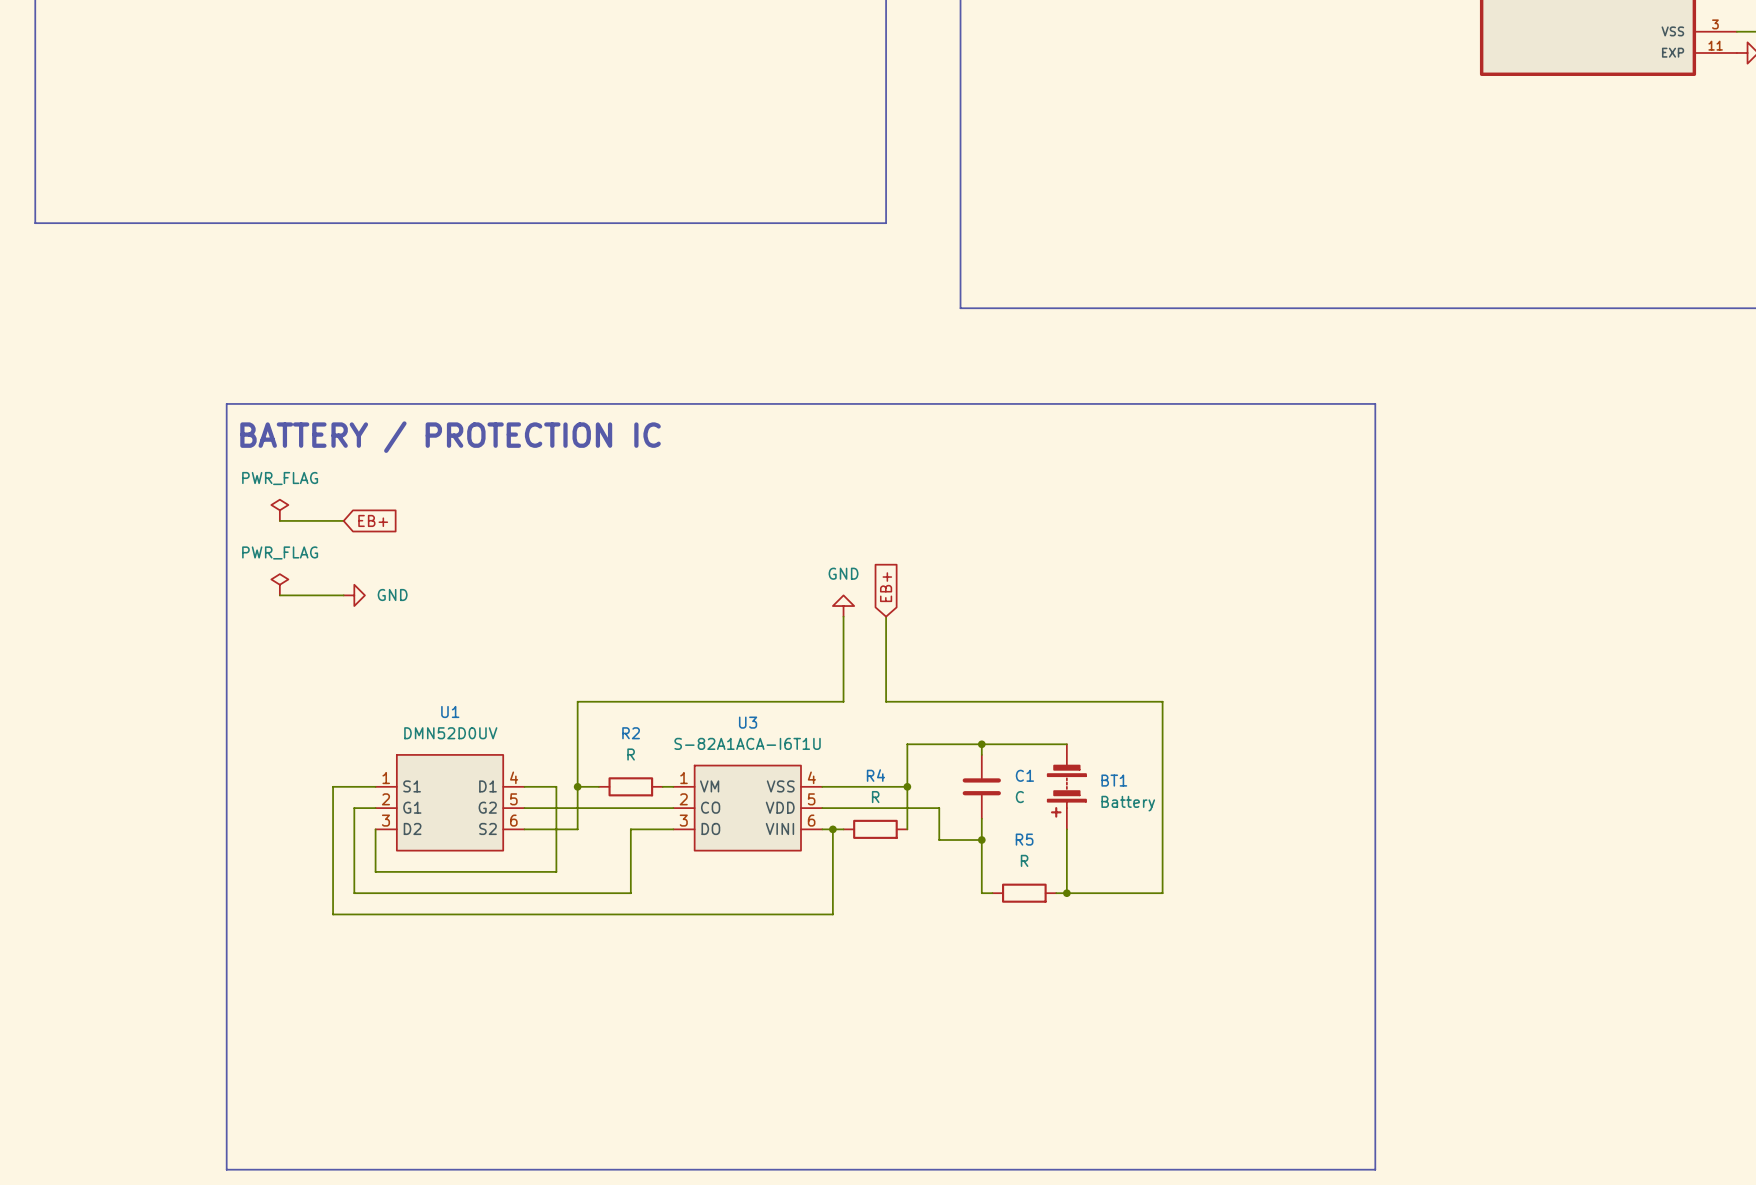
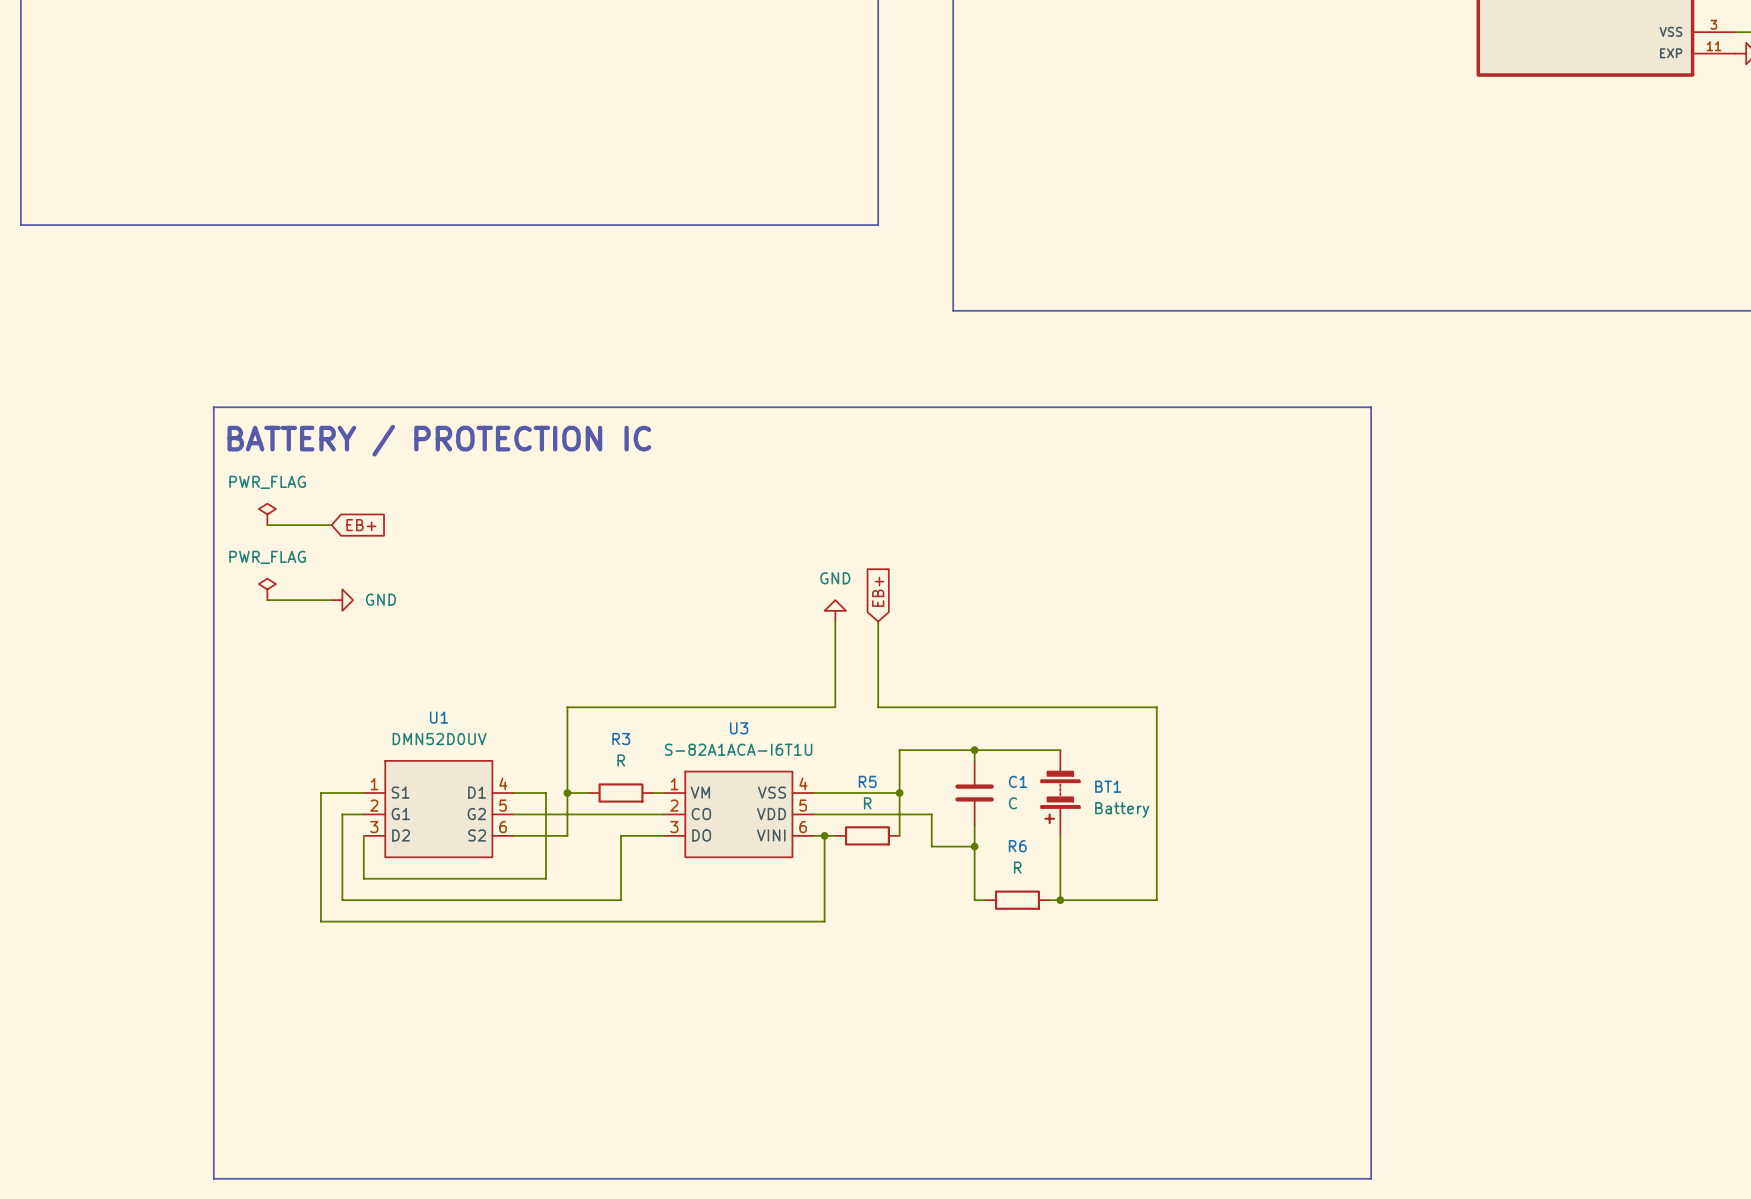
R2 name: R2 (631, 733) -> R3 (621, 739)
R4 name: R4 (875, 775) -> R5 (867, 781)
R5 name: R5 (1024, 839) -> R6 (1017, 846)

